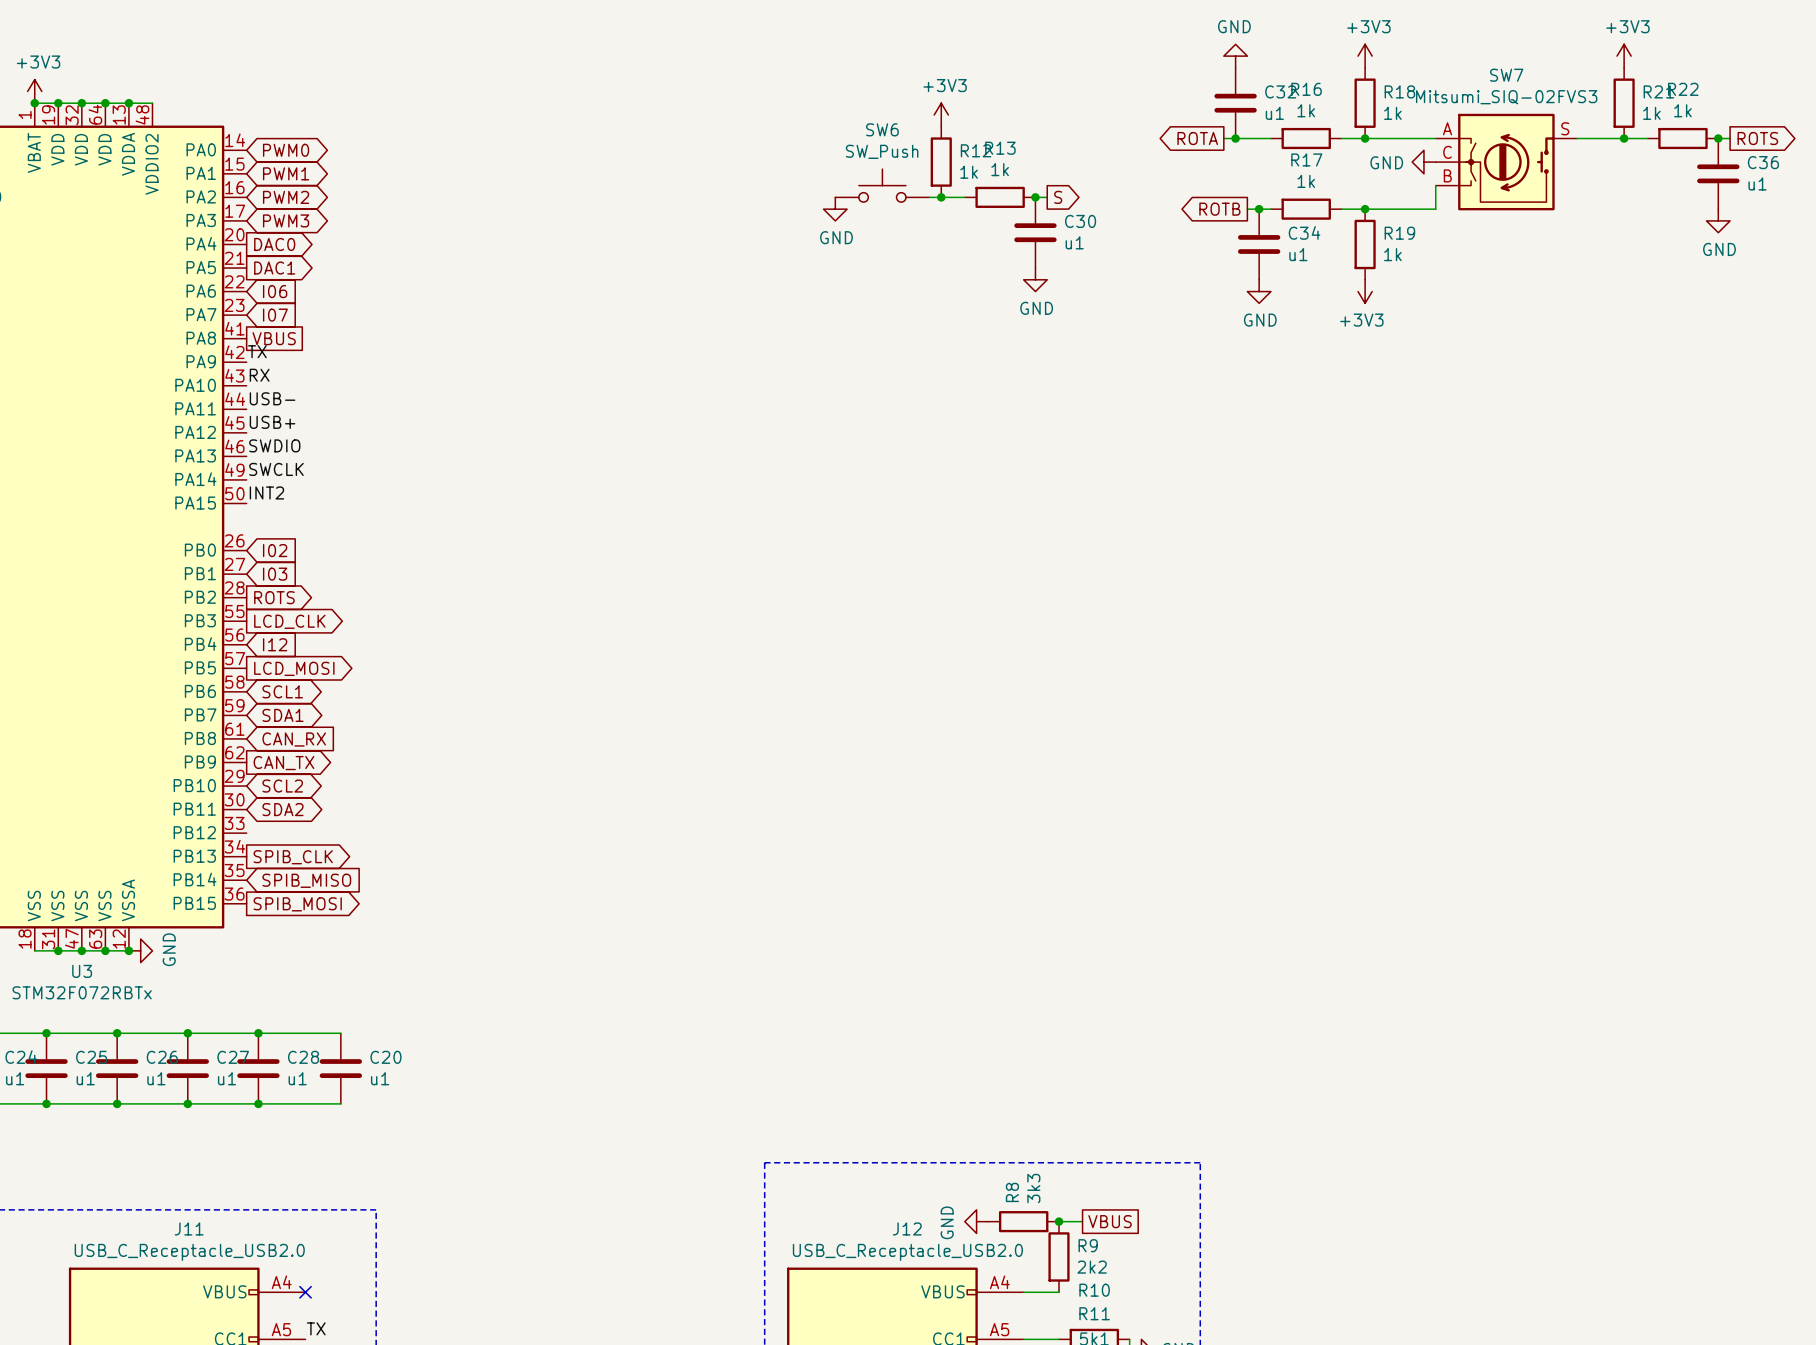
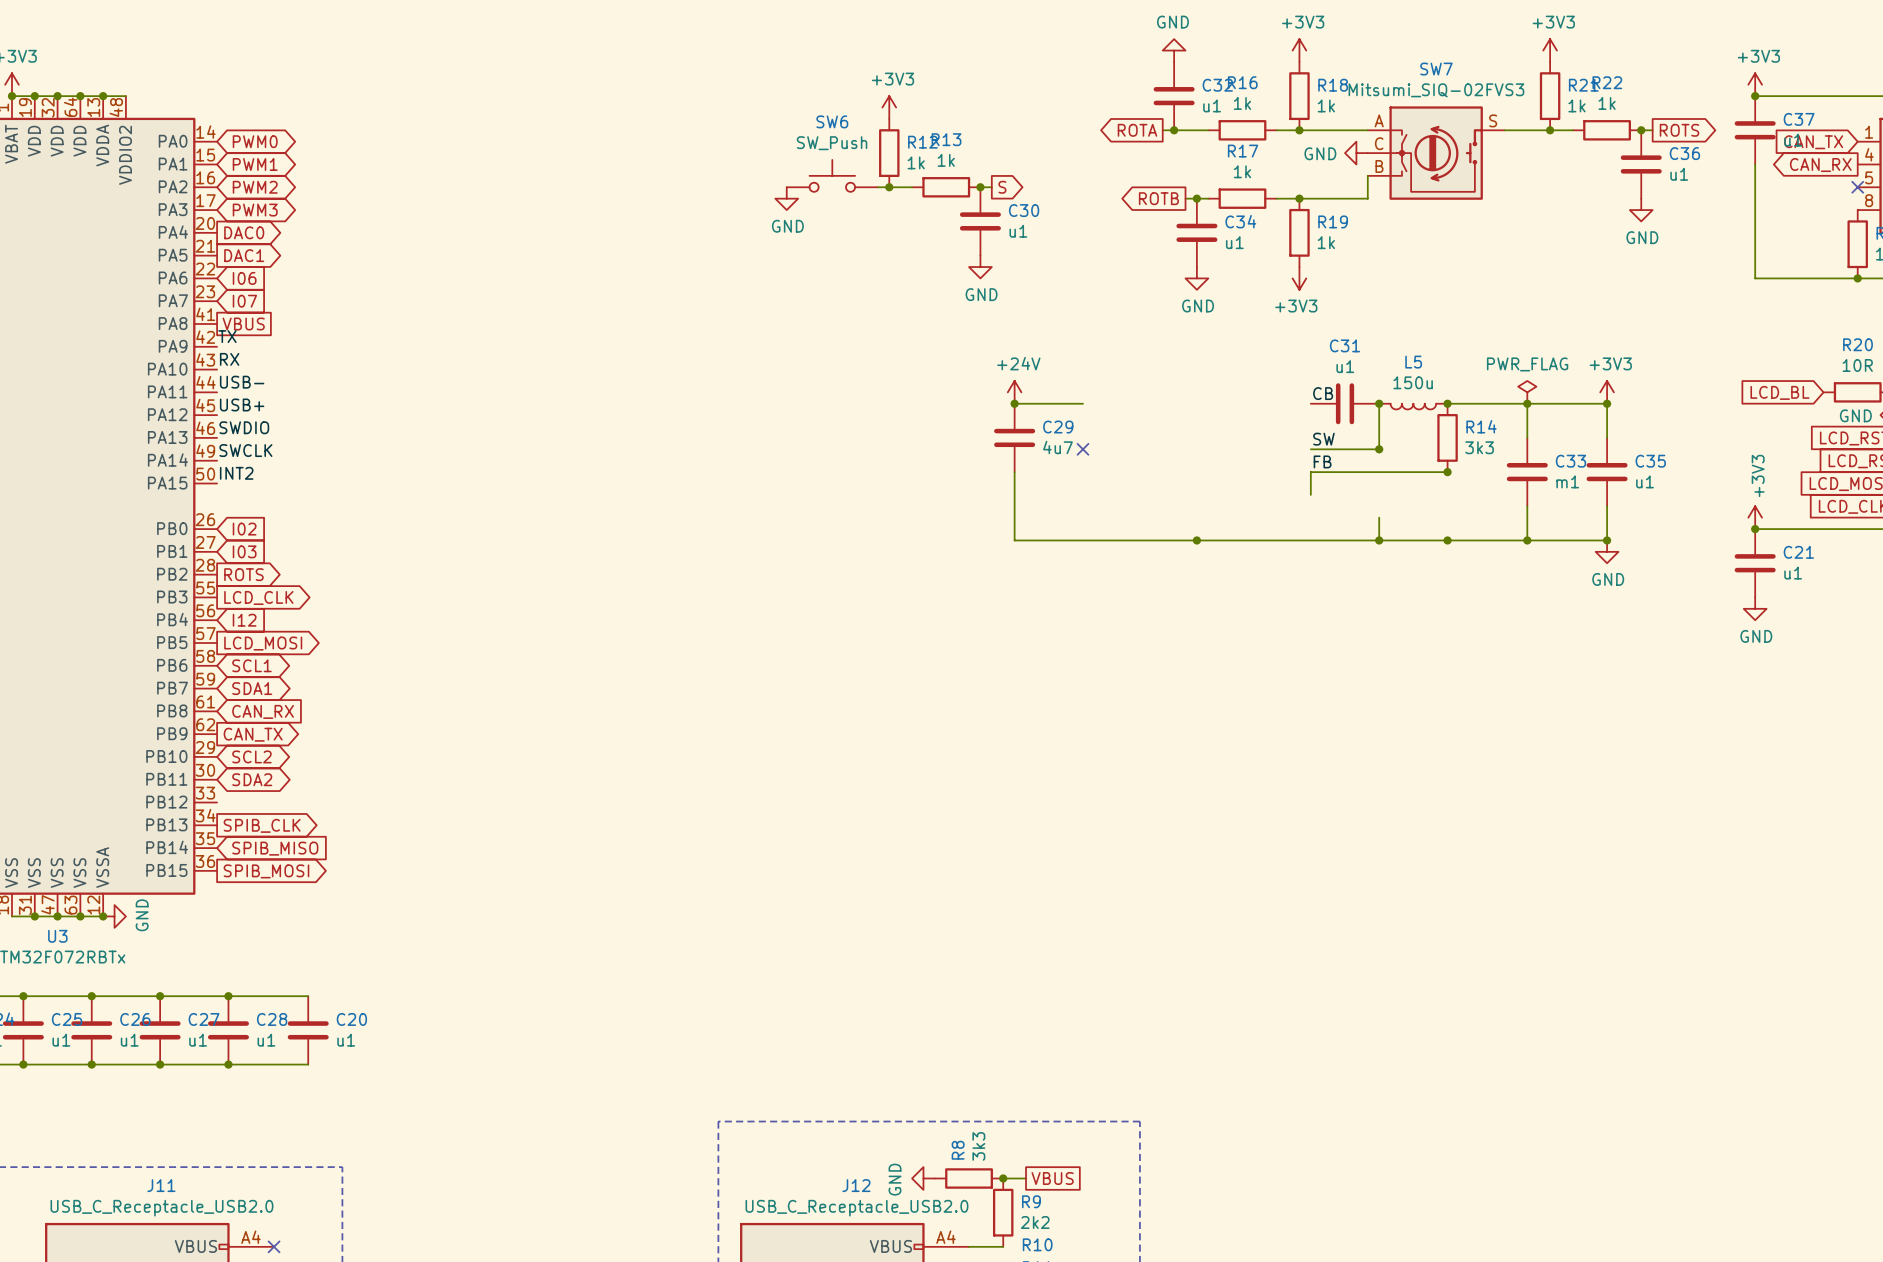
power symbol: none -> +24V (1014, 392)
power symbol: none -> PWR_FLAG (1527, 392)
power symbol: none -> +3V3 (1607, 392)
label: none -> CB (1323, 393)
wire: none -> (1014, 403) (1082, 403)
junction: none -> (1014, 403)
C31: none -> u1 (1345, 403)
wire: none -> (1379, 403) (1379, 449) (1310, 449)
junction: none -> (1379, 403)
wire: none -> (1447, 403) (1607, 403) (1607, 437)
junction: none -> (1447, 403)
wire: none -> (1527, 403) (1527, 437)
junction: none -> (1527, 403)
junction: none -> (1607, 403)
L5: none -> 150u (1413, 406)
C29: none -> 4u7 (1014, 437)
R14: none -> 3k3 (1447, 437)
label: none -> SW (1323, 439)
no-connect mark: none -> (1082, 449)
junction: none -> (1379, 449)
label: none -> FB (1322, 461)
wire: none -> (1014, 472) (1014, 540) (1607, 540) (1607, 506)
wire: none -> (1447, 472) (1310, 472) (1310, 494)
junction: none -> (1447, 472)
C33: none -> m1 (1527, 472)
C35: none -> u1 (1607, 472)
wire: none -> (1527, 506) (1527, 540)
wire: none -> (1379, 517) (1379, 540)
junction: none -> (1196, 540)
junction: none -> (1379, 540)
junction: none -> (1447, 540)
junction: none -> (1527, 540)
junction: none -> (1607, 540)
power symbol: none -> GND (1607, 551)

